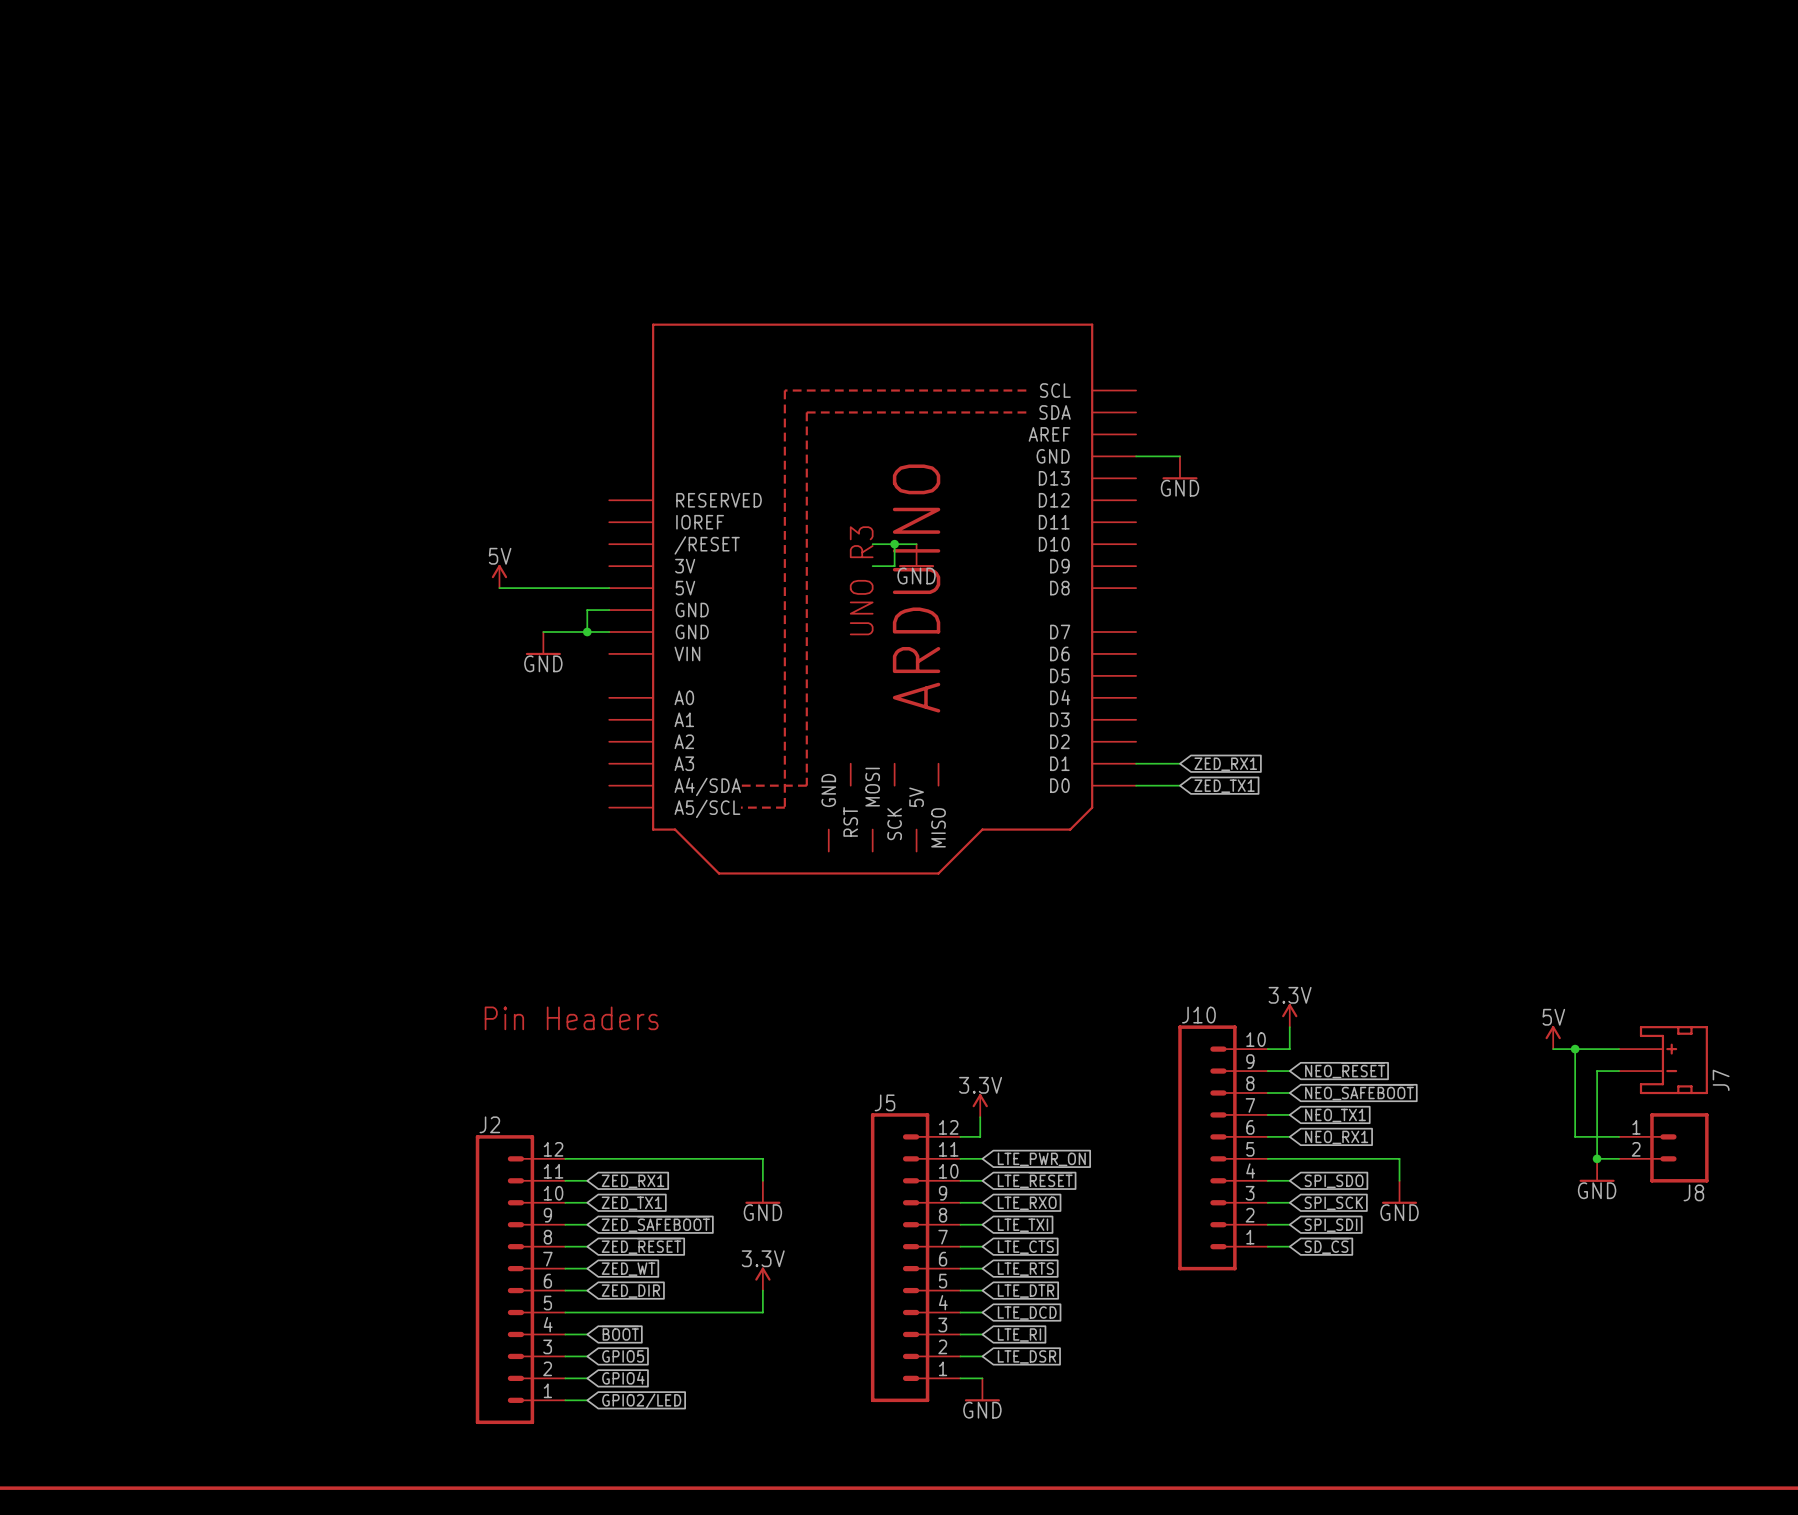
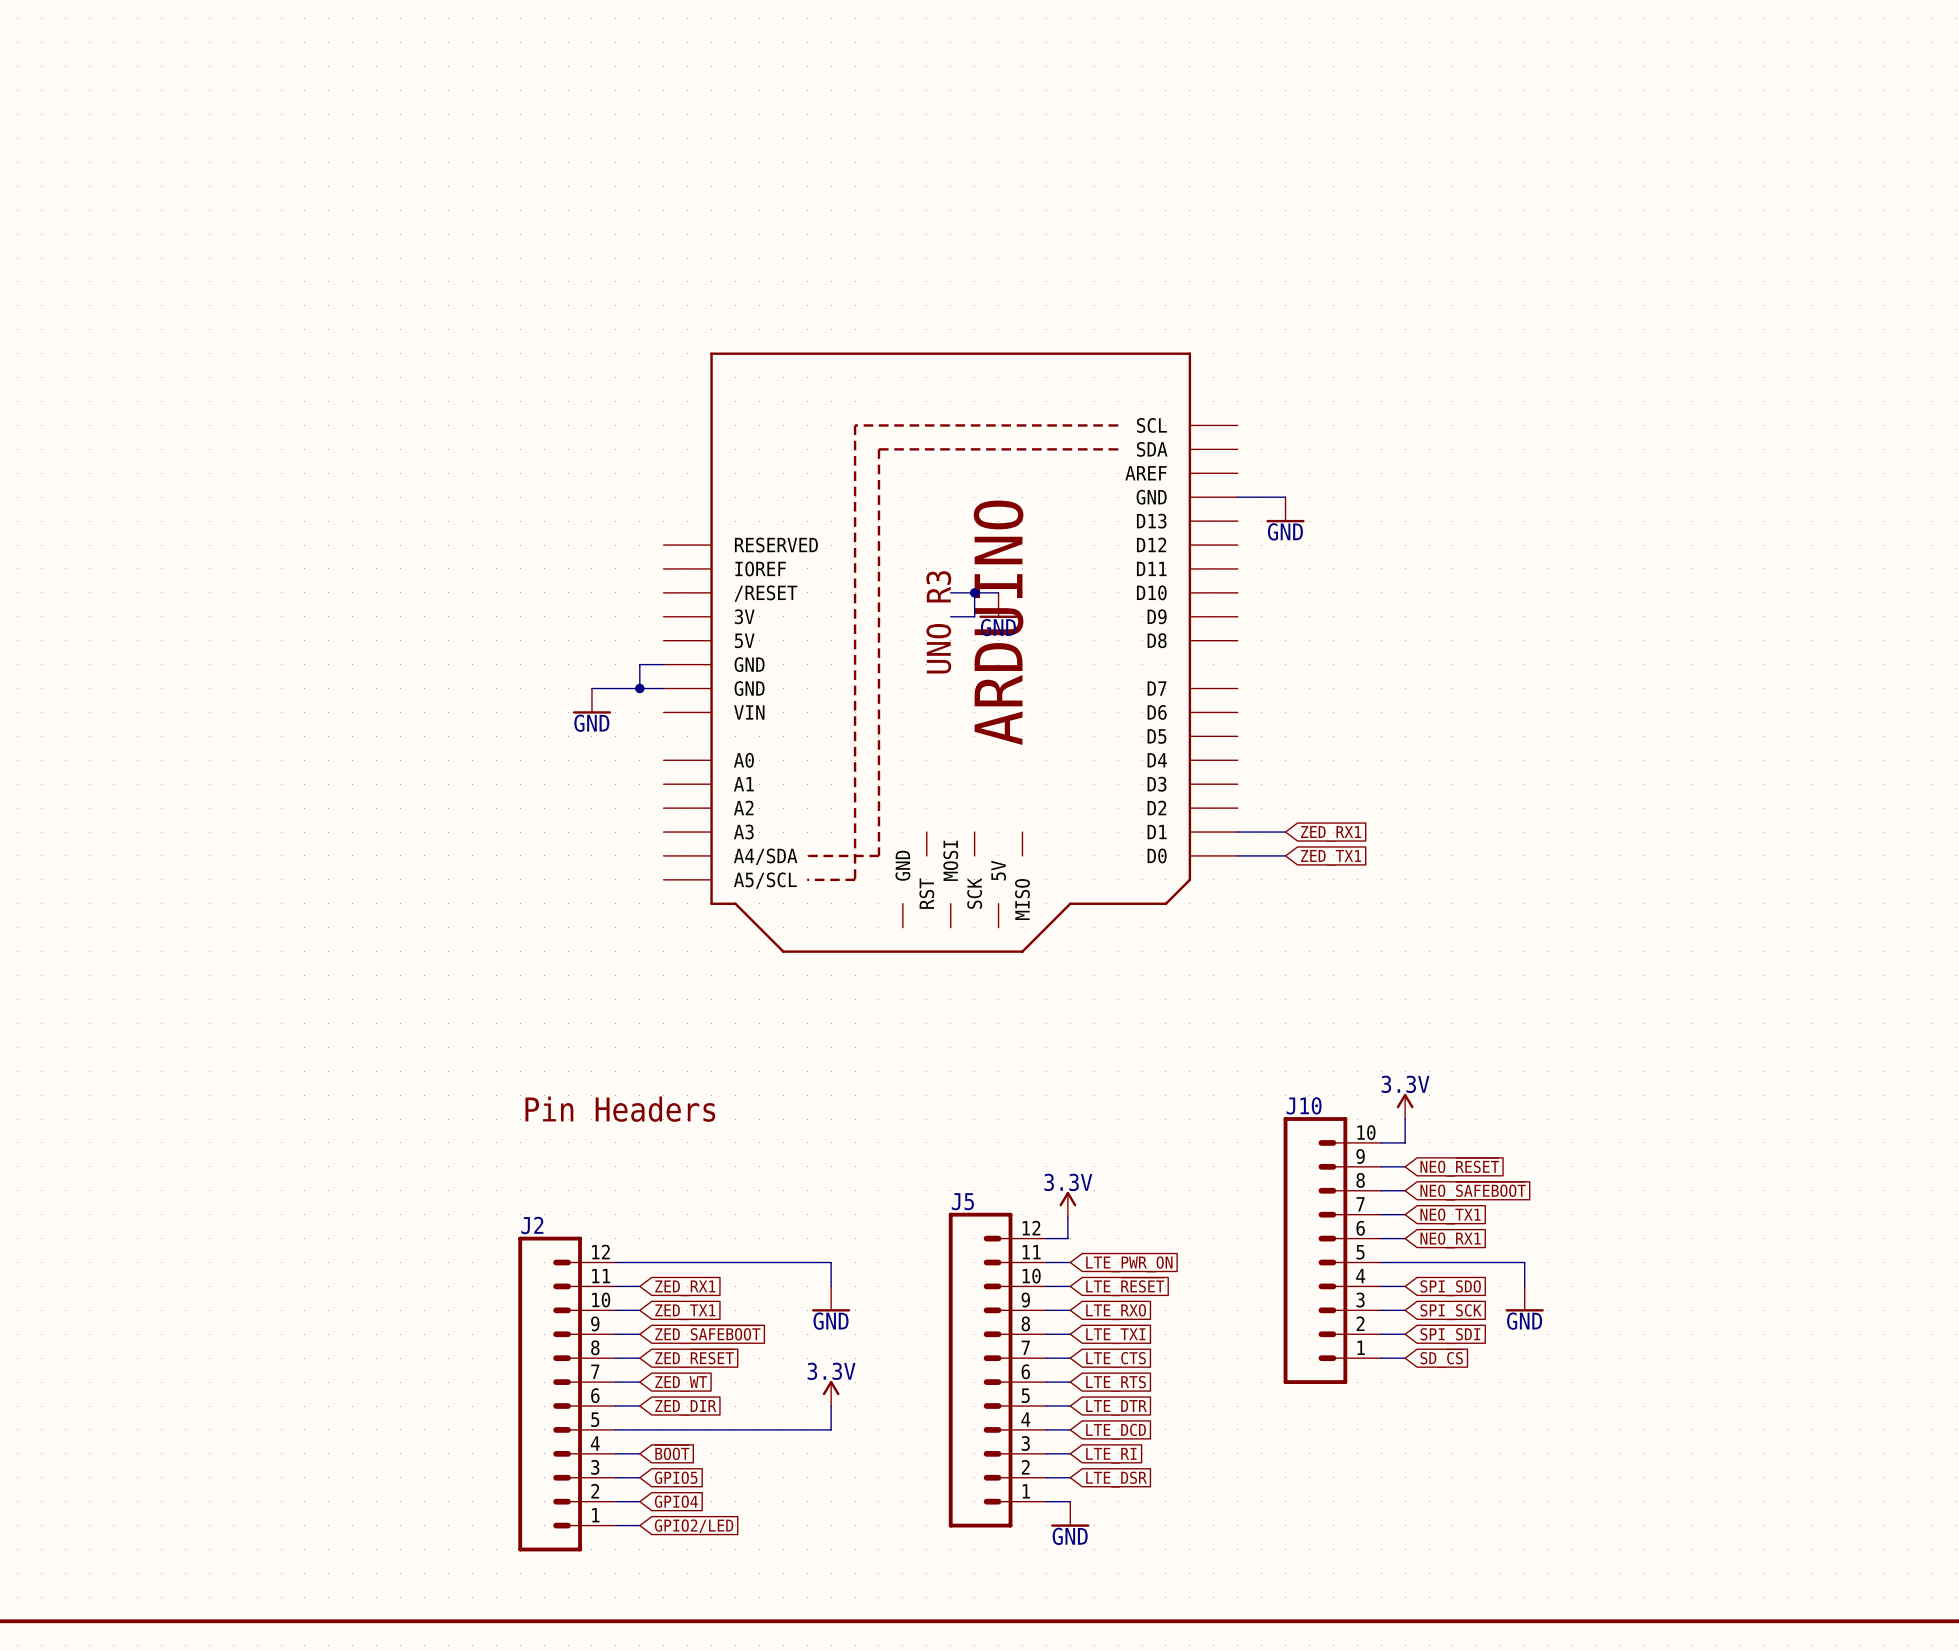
power symbol: 5V (499, 576) -> none
wire: (499, 588) (609, 588) -> none
power symbol: 5V (1553, 1037) -> none
wire: (1553, 1049) (1619, 1049) -> none
wire: (1575, 1049) (1575, 1136) (1619, 1136) -> none
junction: (1575, 1049) -> none
J7: (1663, 1060) -> none
wire: (1619, 1071) (1597, 1071) (1597, 1158) (1619, 1158) -> none
J8: (1663, 1147) -> none
junction: (1597, 1158) -> none
power symbol: GND (1597, 1170) -> none

